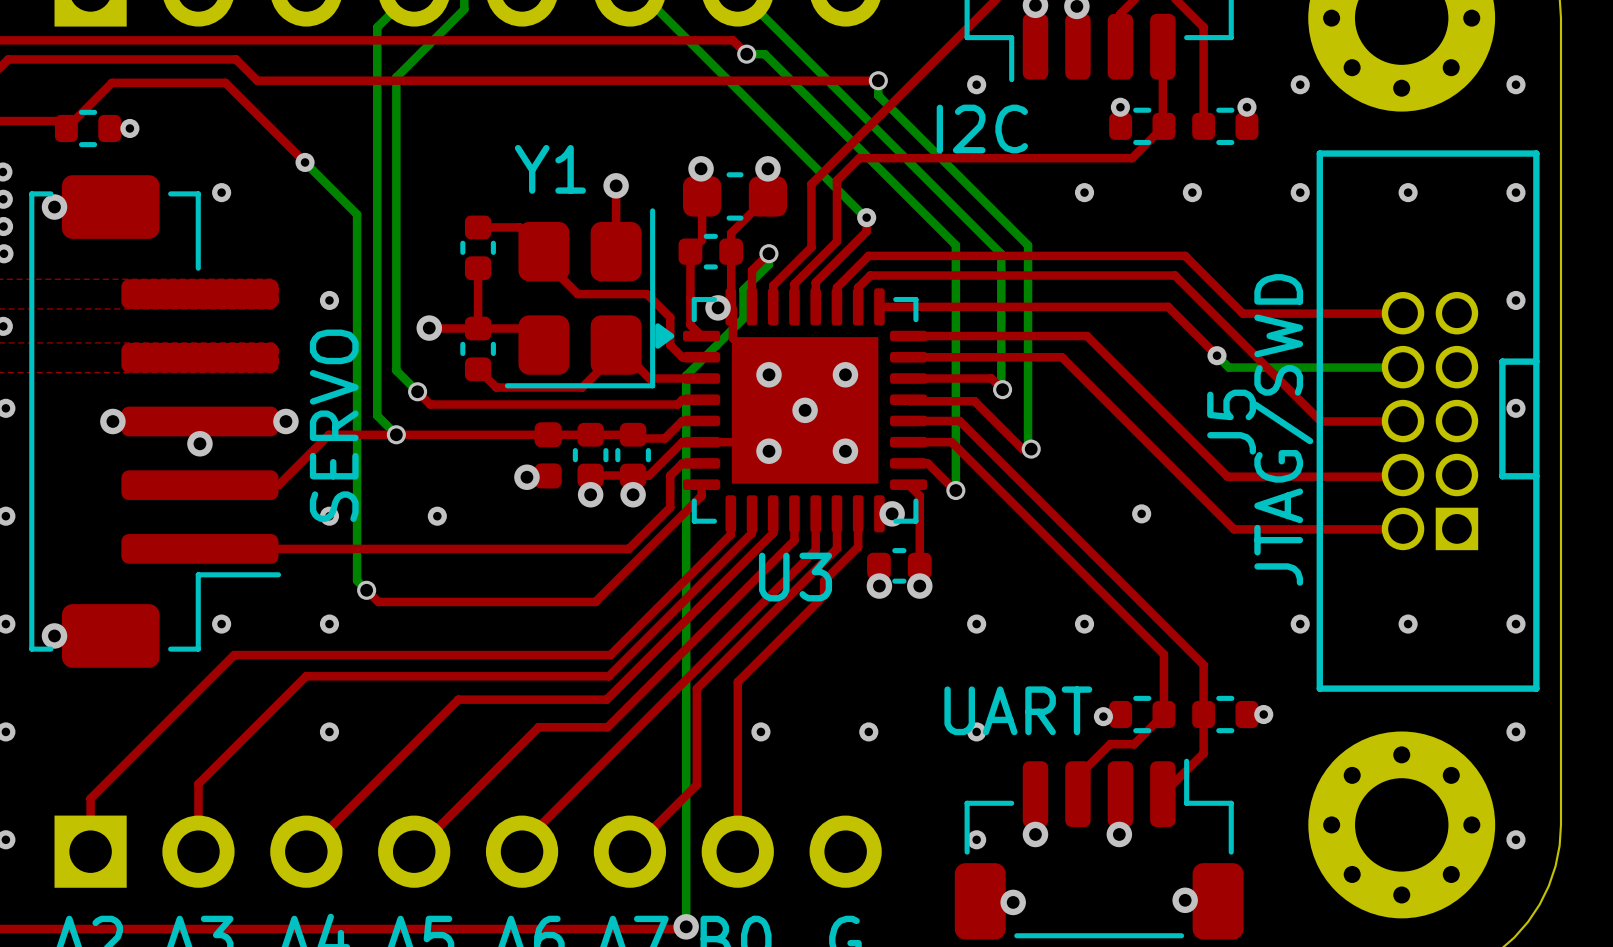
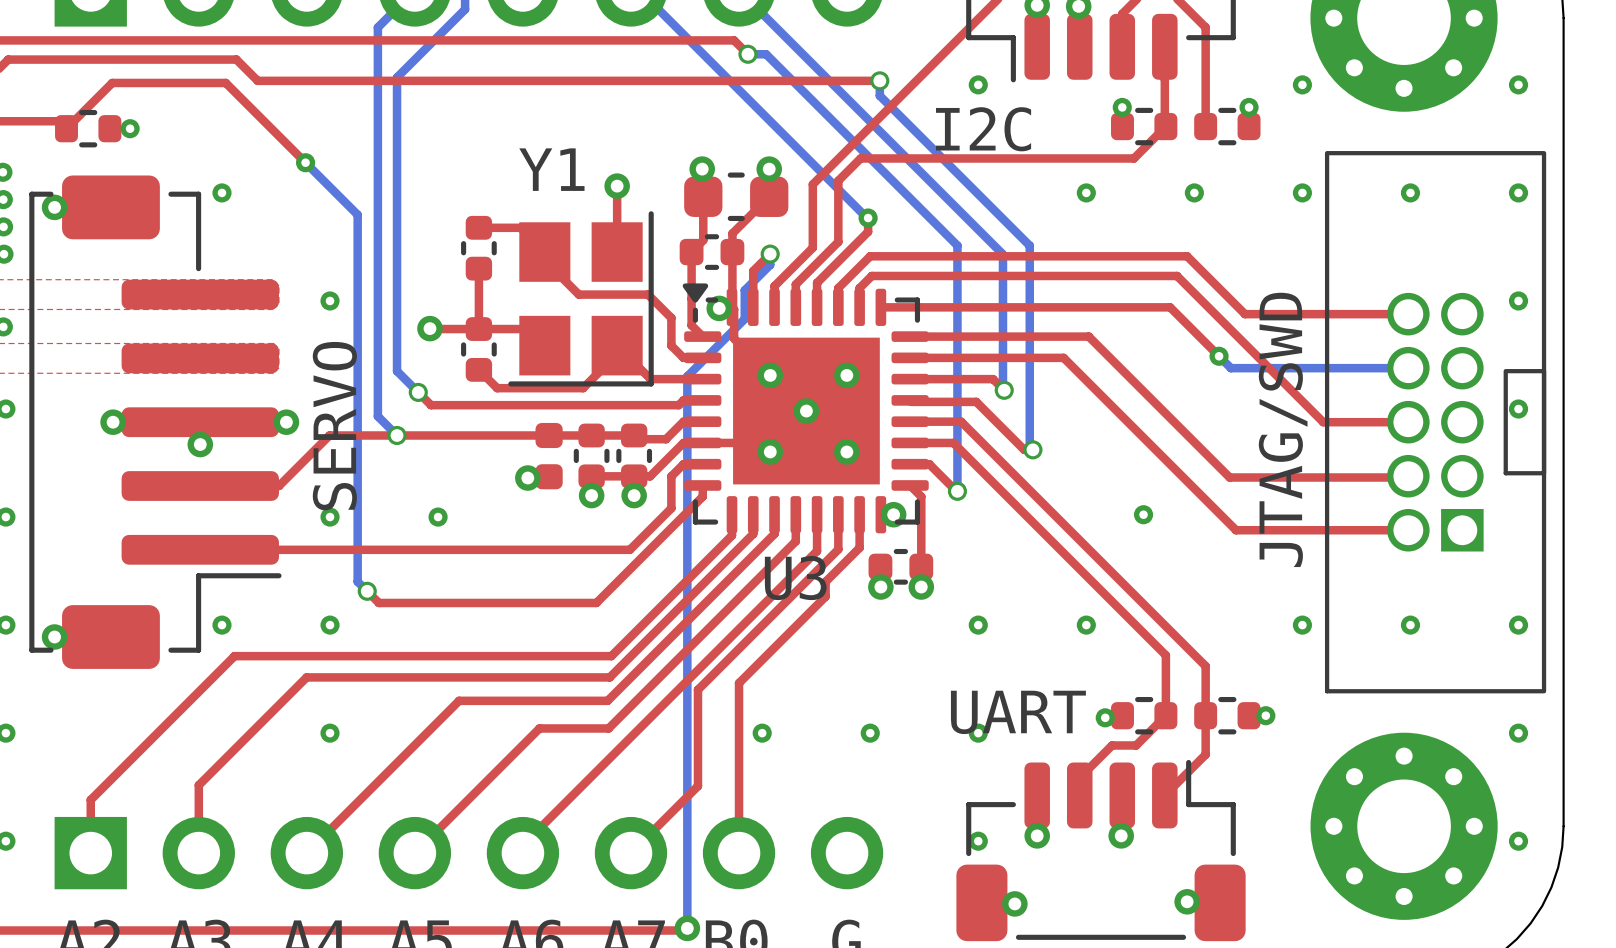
Y1 footprint: [504, 208, 656, 389] -> [508, 211, 654, 387]
U3 footprint: [655, 288, 928, 533] -> [682, 283, 929, 534]
J5: (1428, 421) -> none
part: none -> (1435, 422)

